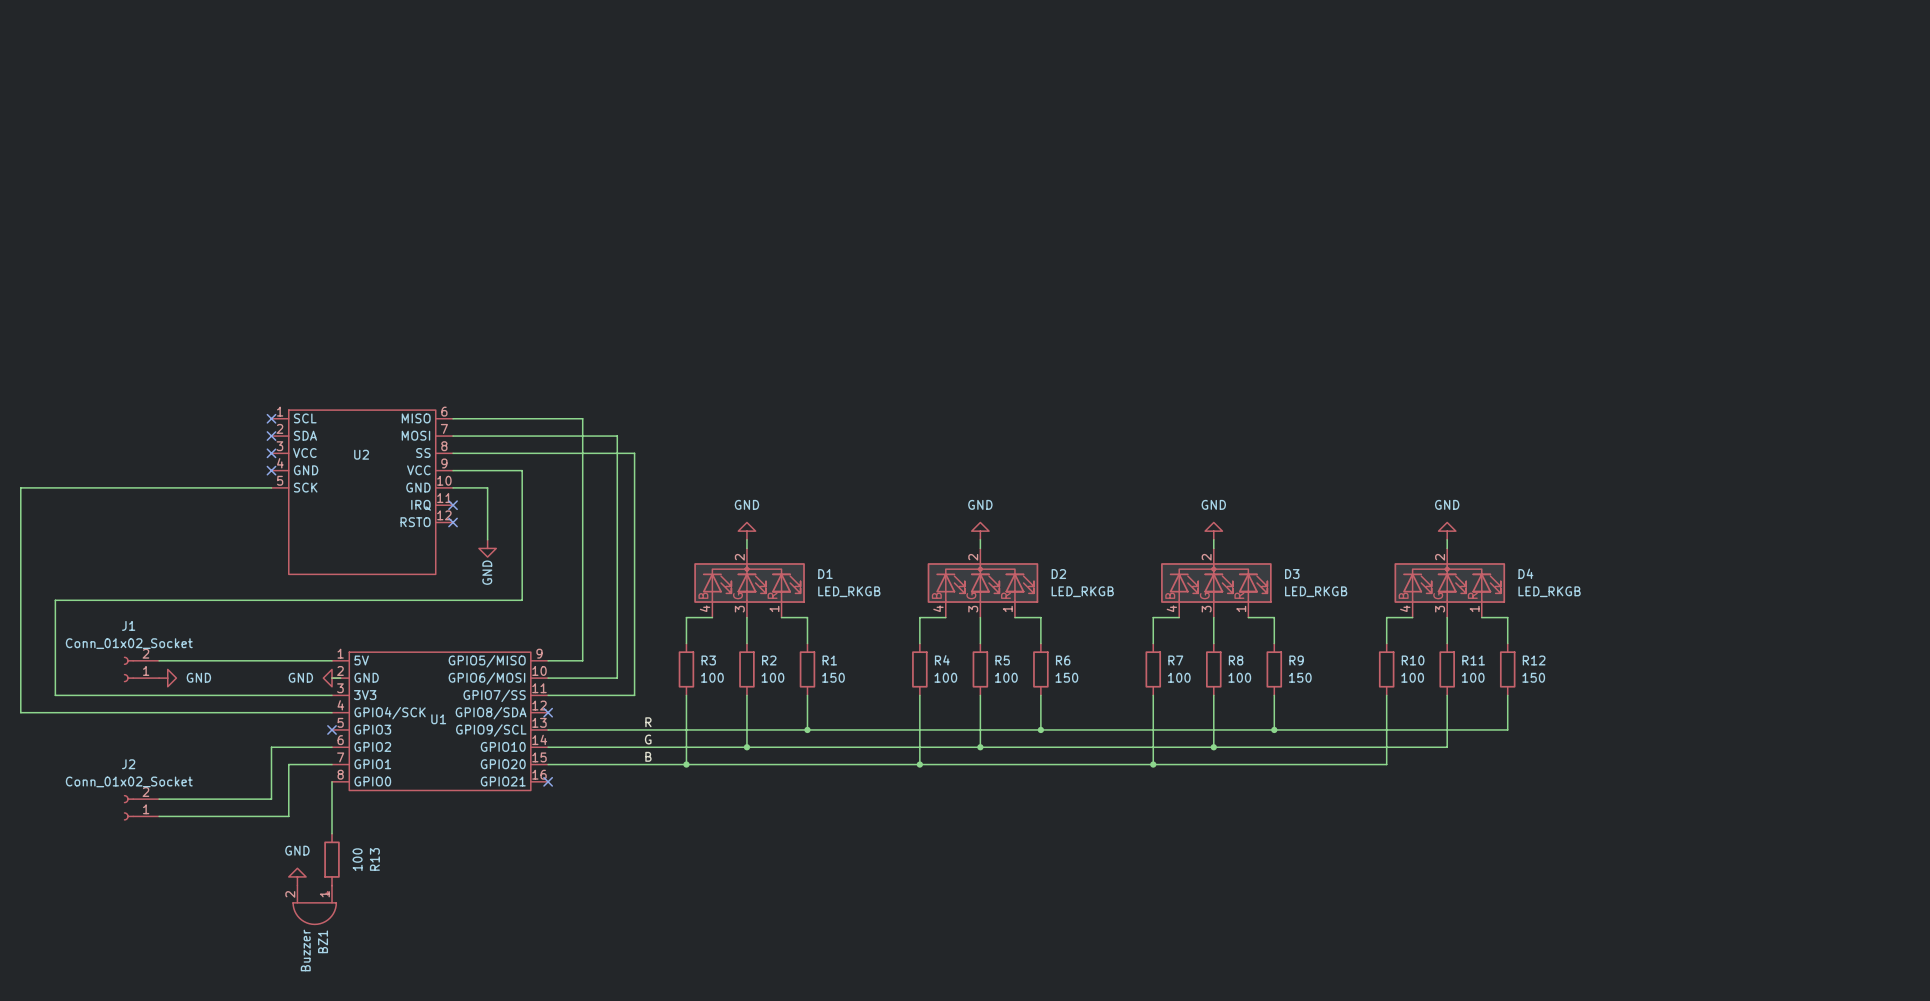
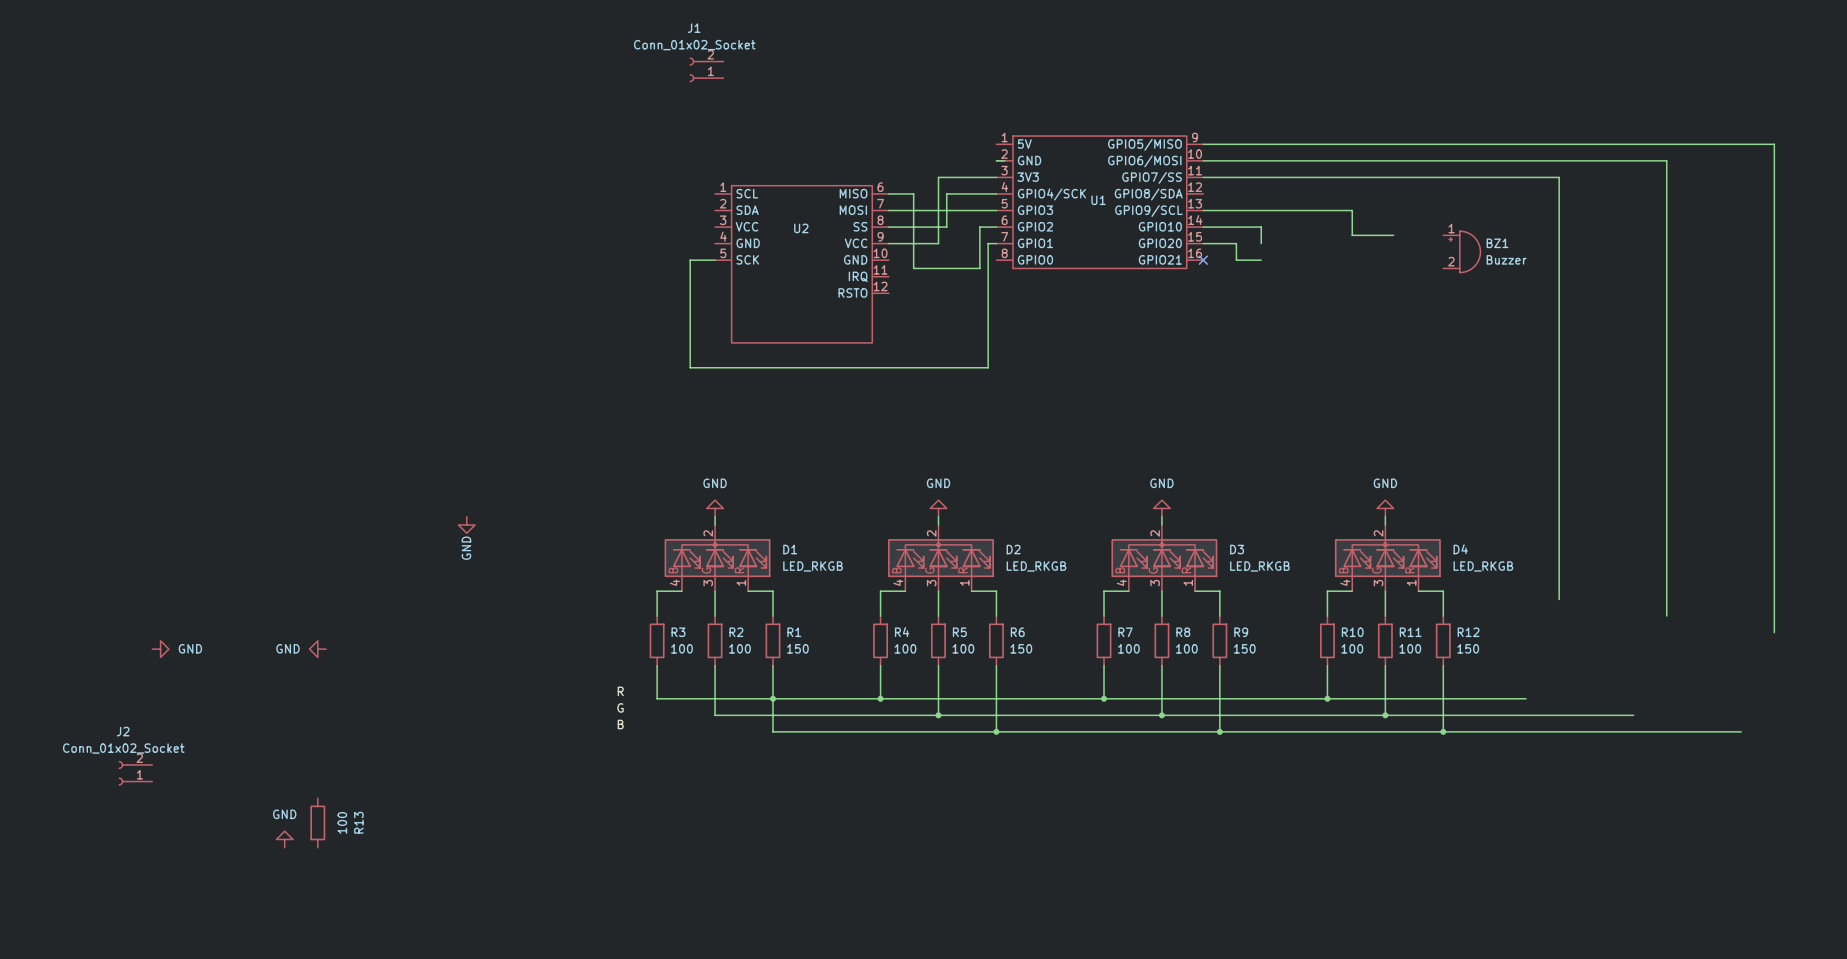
wire: none -> (1203, 144) (1774, 144) (1774, 632)
wire: none -> (996, 160) (1004, 160)
wire: none -> (1203, 160) (1666, 160) (1666, 616)
wire: none -> (996, 177) (938, 177) (938, 243) (888, 243)
wire: none -> (1203, 177) (1559, 177) (1559, 599)
wire: none -> (888, 193) (913, 193) (913, 268) (979, 268) (979, 227) (996, 227)
wire: none -> (996, 193) (946, 193) (946, 227) (888, 227)
wire: none -> (888, 210) (996, 210)
wire: none -> (1203, 210) (1352, 210) (1352, 235) (1393, 235)
wire: none -> (1203, 227) (1261, 227) (1261, 243)
wire: none -> (996, 243) (988, 243) (988, 367) (690, 367) (690, 260) (715, 260)
wire: none -> (1203, 243) (1236, 243) (1236, 260) (1261, 260)
no-connect mark: none -> (1203, 260)
no-connect mark: (271, 418) -> none
wire: (453, 418) (582, 418) (582, 660) (548, 660) -> none
no-connect mark: (271, 436) -> none
wire: (453, 436) (617, 436) (617, 678) (548, 678) -> none
no-connect mark: (271, 453) -> none
wire: (453, 453) (634, 453) (634, 695) (548, 695) -> none
no-connect mark: (271, 470) -> none
wire: (453, 470) (522, 470) (522, 600) (55, 600) (55, 695) (332, 695) -> none
wire: (271, 487) (20, 487) (20, 712) (332, 712) -> none
wire: (453, 487) (487, 487) (487, 539) -> none
U2 position: (362, 492) -> (801, 264)
no-connect mark: (453, 505) -> none
no-connect mark: (453, 522) -> none
wire: (159, 660) (332, 660) -> none
J1 position: (141, 669) -> (706, 69)
no-connect mark: (548, 712) -> none
U1 position: (440, 721) -> (1099, 202)
no-connect mark: (332, 729) -> none
wire: (548, 729) (686, 729) (686, 764) -> none
wire: (919, 729) (919, 764) -> none
junction position: (1040, 729) -> (996, 731)
wire: (1153, 729) (1153, 764) -> (996, 698) (996, 731)
wire: none -> (1219, 698) (1219, 731)
junction position: (1274, 729) -> (1219, 731)
wire: (1386, 729) (1386, 764) -> (1741, 731) (1327, 731)
junction: none -> (1327, 698)
wire: none -> (1526, 698) (1443, 698) (1443, 731)
wire: (332, 747) (271, 747) (271, 799) (159, 799) -> none
wire: (548, 747) (746, 747) -> none
junction: (746, 747) -> none
wire: none -> (1385, 715) (1633, 715)
junction: none -> (1385, 715)
wire: (332, 764) (288, 764) (288, 816) (159, 816) -> none
wire: (548, 764) (807, 764) -> (772, 698) (772, 731)
junction: (686, 764) -> none
junction position: (919, 764) -> (880, 698)
junction position: (1153, 764) -> (1104, 698)
junction: none -> (1443, 731)
wire: (332, 781) (332, 833) -> none
no-connect mark: (548, 781) -> none
BZ1 position: (314, 904) -> (1461, 251)
BZ1 rotation: 0° (314, 908) -> 90° counterclockwise (1464, 251)

